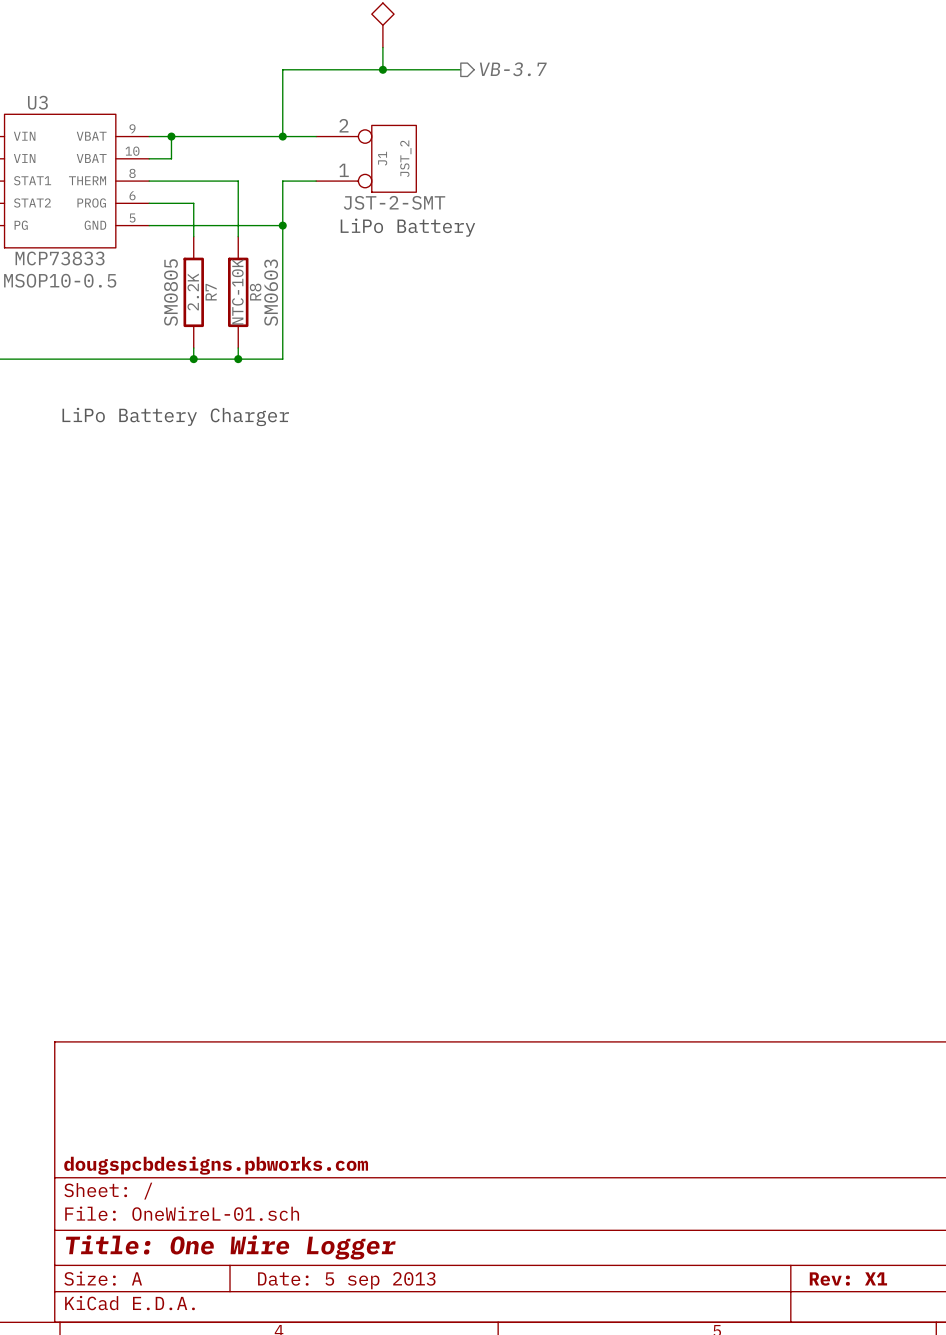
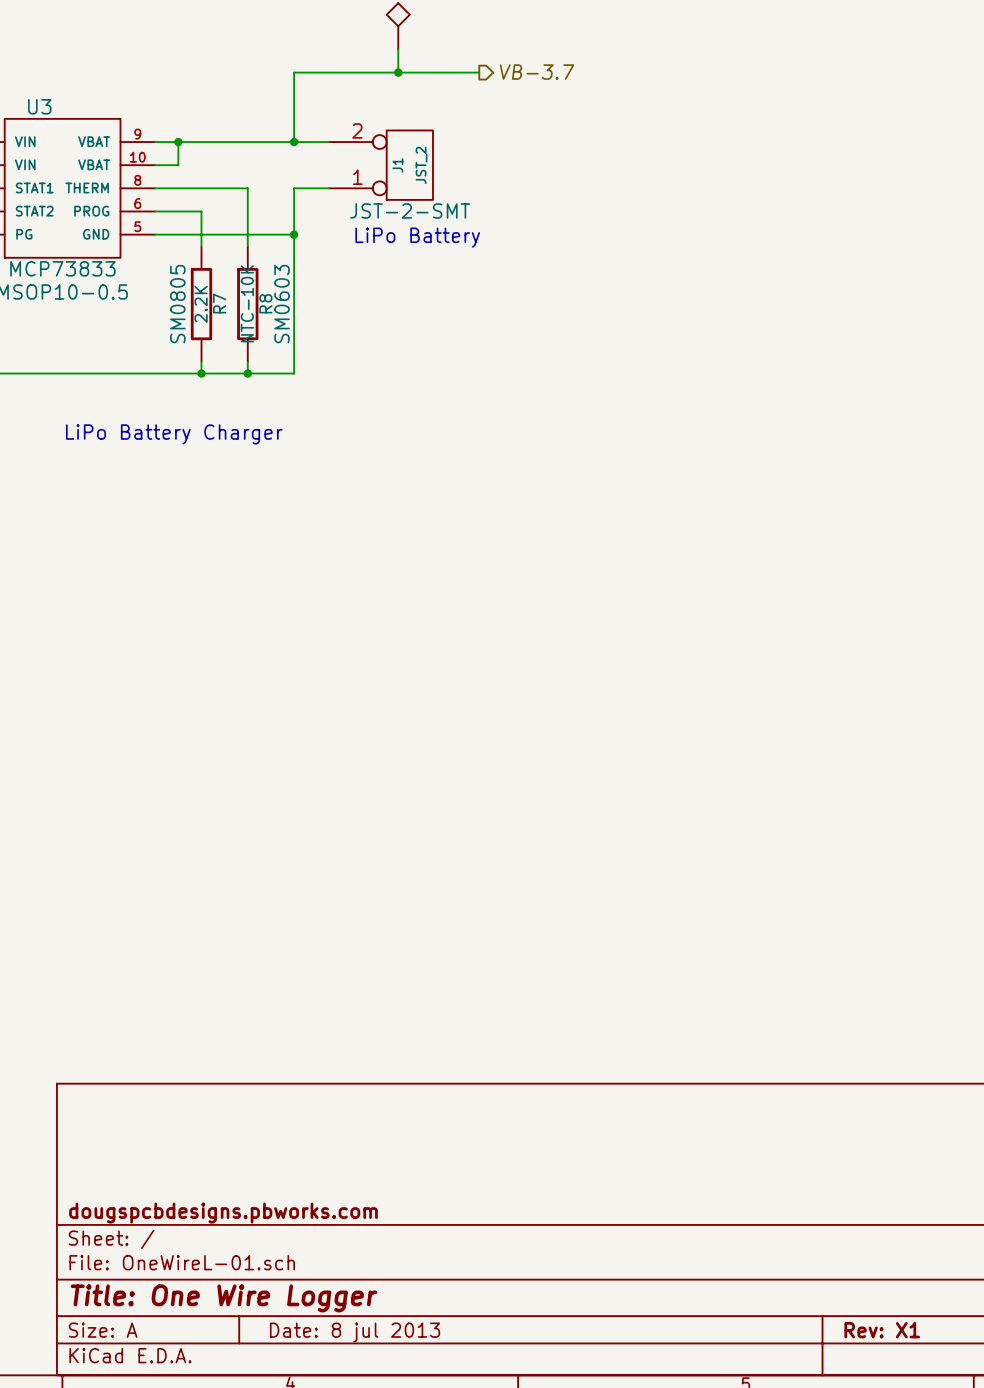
title block: Date: 5 sep 2013 (346, 1280) -> Date: 8 jul 2013 (355, 1332)

